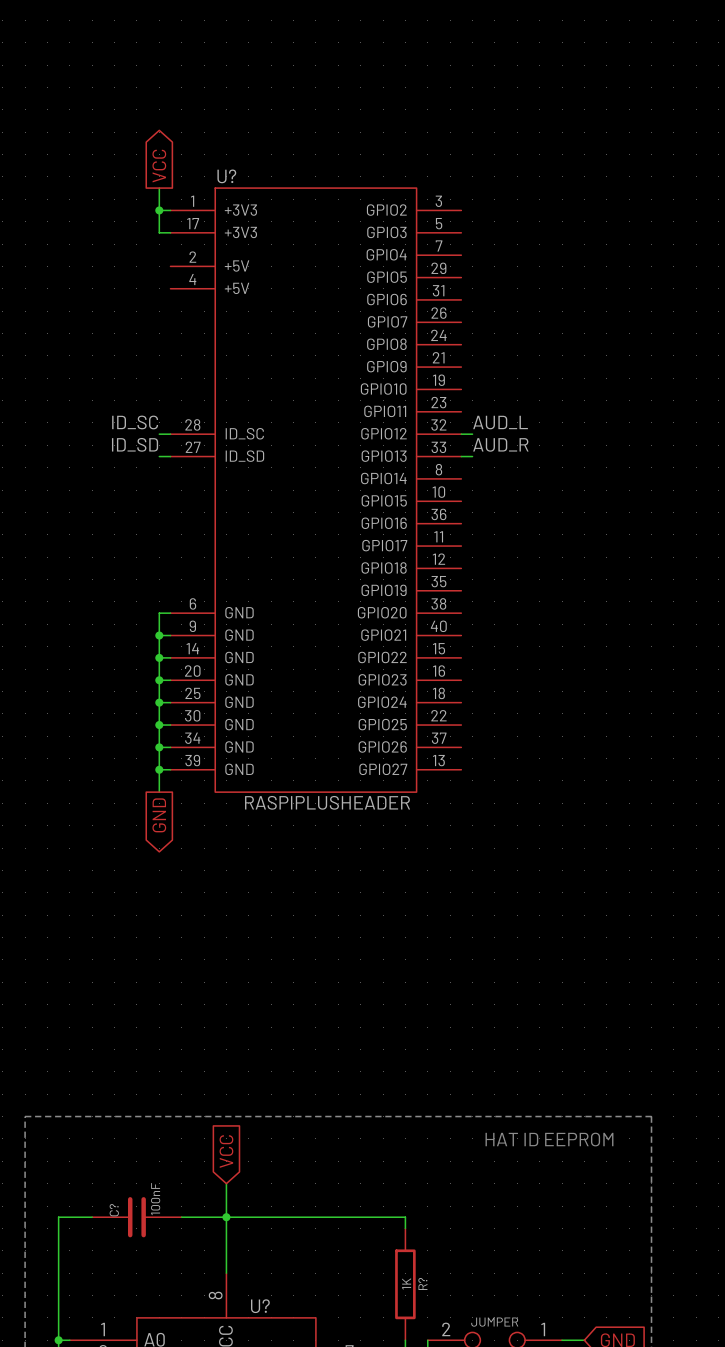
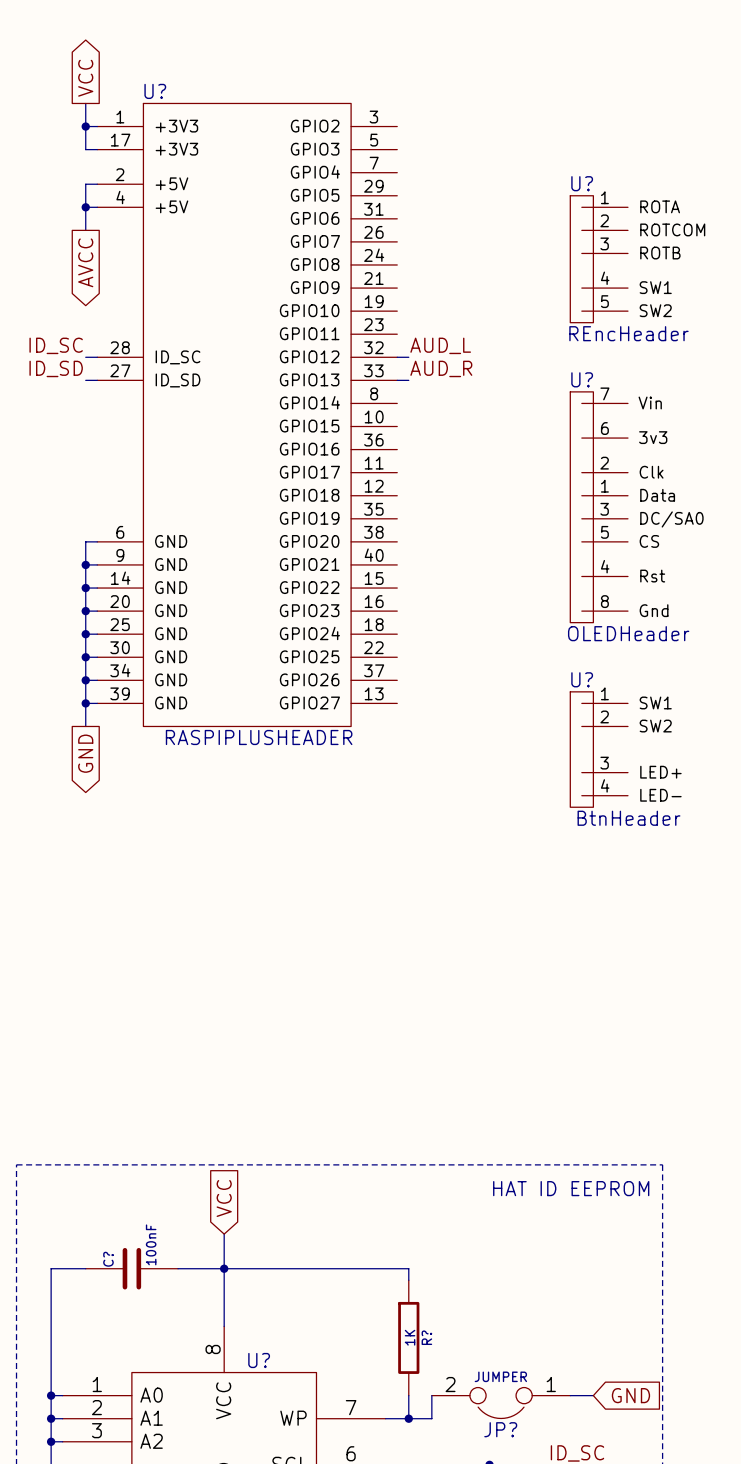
junction: none -> (85, 126)
wire: none -> (97, 184) (85, 184) (85, 230)
global label position: VCC (159, 166) -> VCC (85, 78)
wire: none -> (85, 207) (97, 207)
junction: none -> (85, 207)
wire: (159, 188) (159, 232) (170, 232) -> (85, 103) (85, 149) (97, 149)
wire: (159, 210) (170, 210) -> (85, 126) (97, 126)
junction: (159, 210) -> none
global label: none -> AVCC (85, 262)
U?: none -> REncHeader (599, 259)
label position: ID_SC (135, 422) -> ID_SC (56, 345)
label position: AUD_L (500, 422) -> AUD_L (440, 345)
wire: (159, 434) (170, 434) -> (85, 357) (97, 357)
wire: (461, 434) (472, 434) -> (397, 357) (408, 357)
label position: ID_SD (135, 444) -> ID_SD (56, 368)
label position: AUD_R (500, 444) -> AUD_R (441, 368)
wire: (159, 456) (170, 456) -> (85, 380) (97, 380)
wire: (461, 456) (472, 456) -> (397, 380) (408, 380)
U?: none -> OLEDHeader (599, 507)
U? position: (315, 490) -> (247, 414)
junction: none -> (85, 564)
junction: none -> (85, 588)
junction: none -> (85, 611)
junction: none -> (85, 634)
wire: (170, 613) (159, 613) (159, 792) -> (97, 541) (85, 541) (85, 726)
junction: none -> (85, 657)
wire: (159, 635) (170, 635) -> (85, 564) (97, 564)
junction: (159, 635) -> none
junction: none -> (85, 680)
wire: (159, 657) (170, 657) -> (85, 588) (97, 588)
junction: (159, 657) -> none
junction: none -> (85, 703)
wire: (159, 680) (170, 680) -> (85, 611) (97, 611)
junction: (159, 680) -> none
wire: (159, 702) (170, 702) -> (85, 634) (97, 634)
junction: (159, 702) -> none
U?: none -> BtnHeader (599, 749)
wire: (159, 725) (170, 725) -> (85, 657) (97, 657)
junction: (159, 725) -> none
wire: (159, 747) (170, 747) -> (85, 680) (97, 680)
junction: (159, 747) -> none
wire: (159, 769) (170, 769) -> (85, 703) (97, 703)
junction: (159, 769) -> none
global label position: GND (159, 815) -> GND (85, 753)

